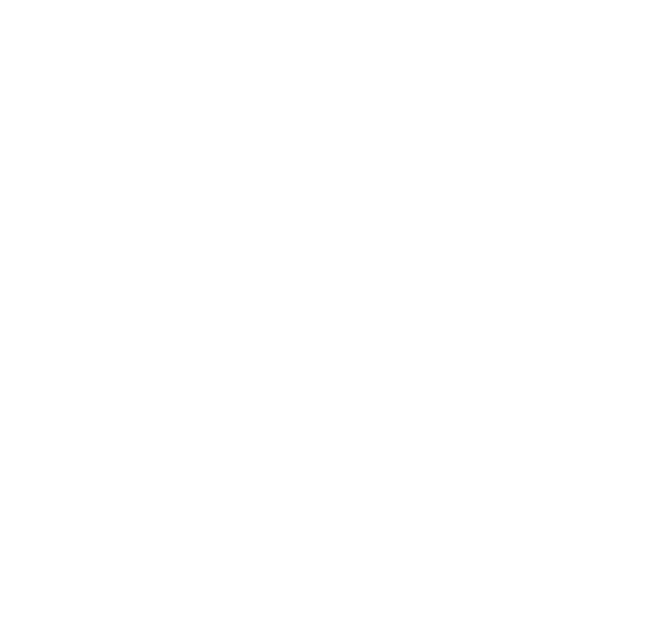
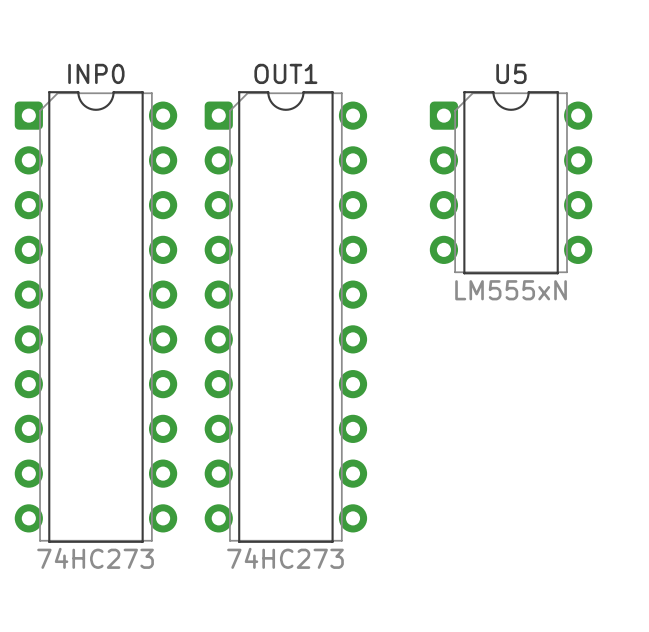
U5: none -> LM555xN (511, 182)
INP0: none -> 74HC273 (95, 317)
OUT1: none -> 74HC273 (285, 317)

